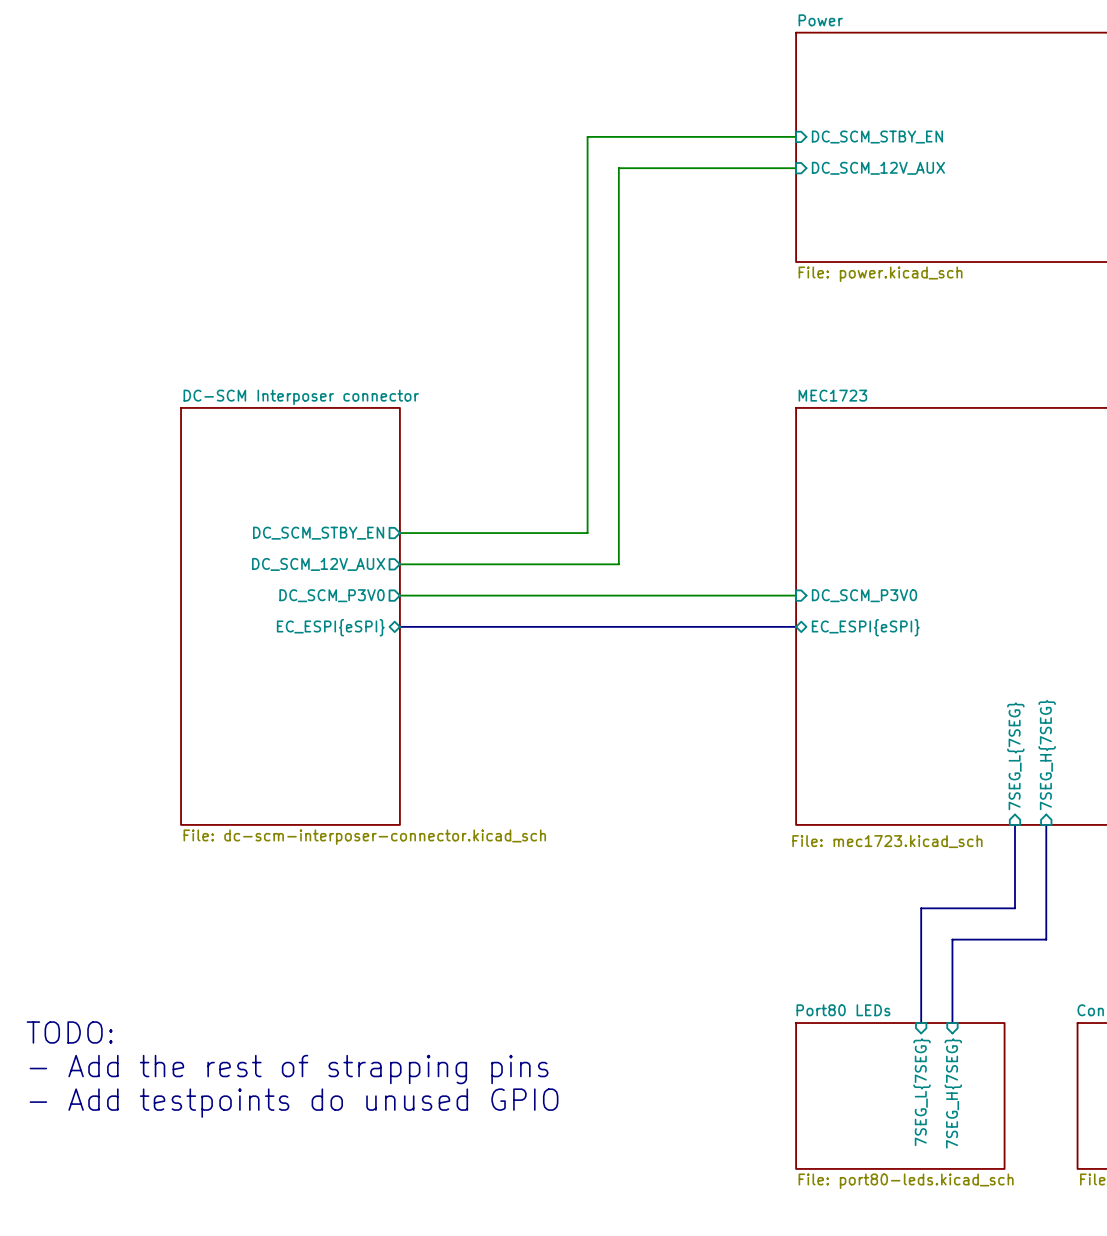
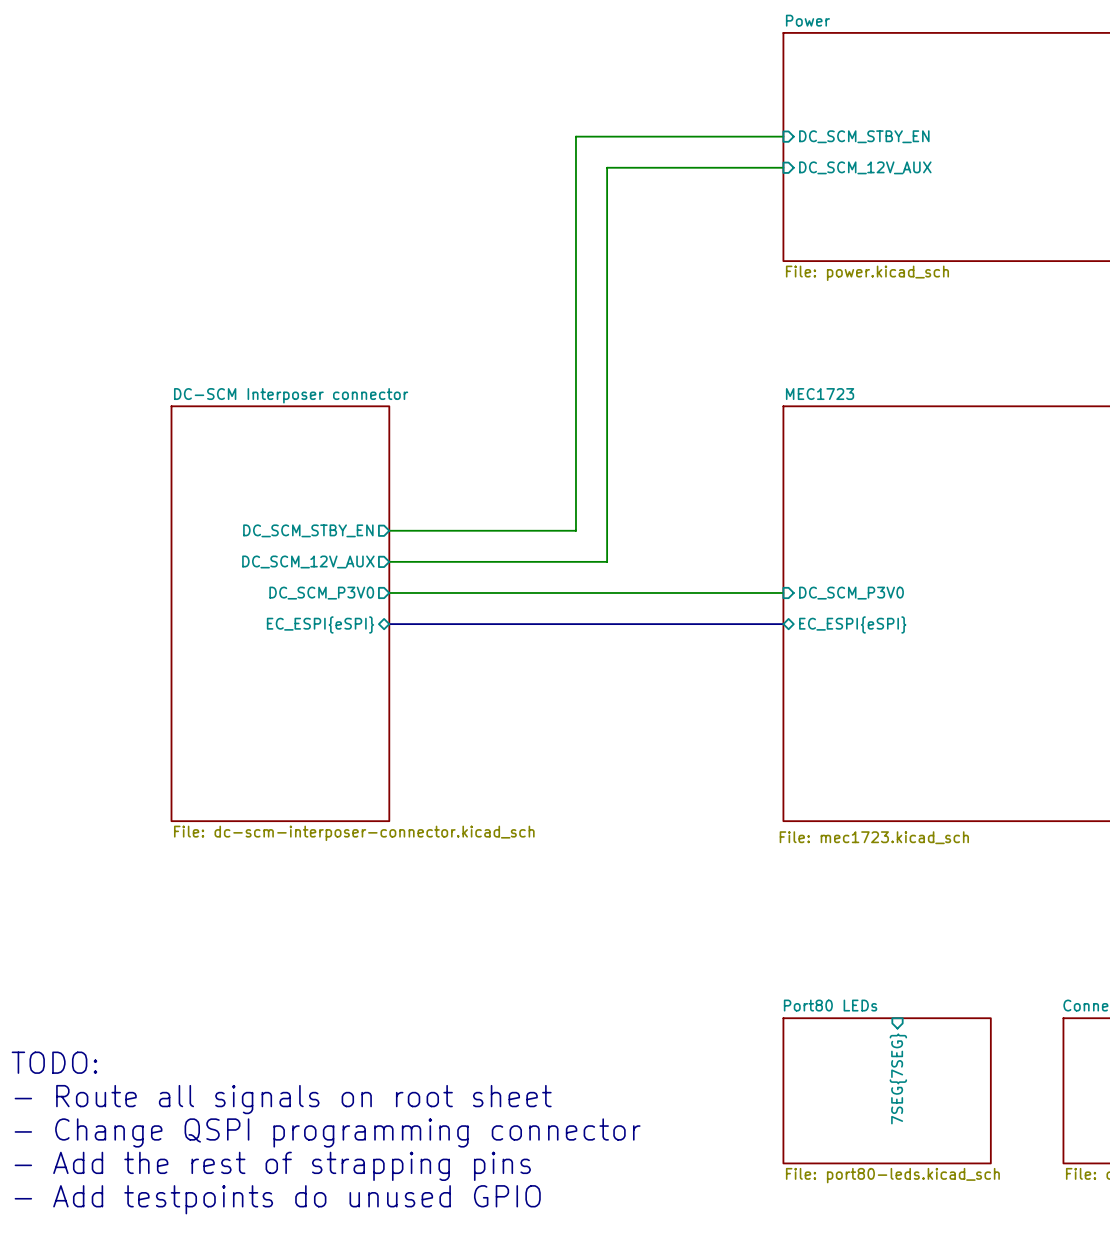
sheet pin: 7SEG_H{7SEG} (1047, 755) -> none
sheet pin: 7SEG_L{7SEG} (1015, 756) -> none
bus: (1015, 824) (1015, 908) (921, 908) (921, 1023) -> none
bus: (1046, 824) (1046, 939) (952, 939) (952, 1023) -> none
text position: TODO: (69, 1032) -> TODO: (54, 1062)
text position: - Add the rest of strapping pins (289, 1069) -> - Add the rest of strapping pins (272, 1166)
sheet pin: 7SEG_L{7SEG} (922, 1092) -> 7SEG{7SEG} (898, 1078)
sheet pin: 7SEG_H{7SEG} (953, 1093) -> none
text position: - Add testpoints do unused GPIO (294, 1103) -> - Add testpoints do unused GPIO (277, 1199)
text: none -> - Route all signals on root sheet (283, 1099)
text: none -> - Change QSPI programming connector (327, 1132)

